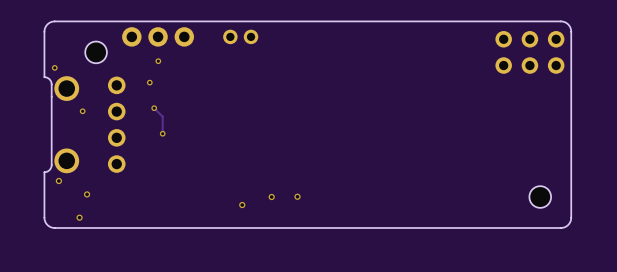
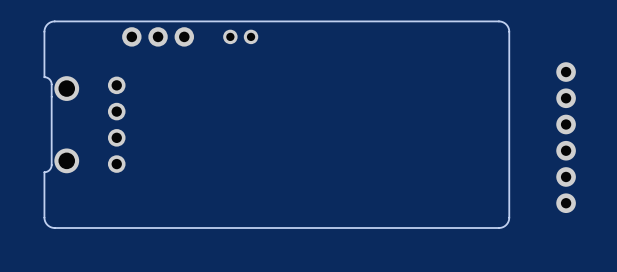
board edge: (498, 21) (562, 21) (569, 25) (571, 31) (570, 221) (562, 227) (498, 228) -> (498, 21) (506, 24) (509, 31) (509, 217) (506, 224) (498, 228)
hole: (96, 52) -> none
part: (529, 52) -> none
via: (158, 61) -> none
via: (54, 67) -> none
via: (149, 82) -> none
track: (154, 108) (162, 116) (162, 133) -> none
via: (154, 108) -> none
via: (82, 111) -> none
via: (162, 133) -> none
part: none -> (566, 137)
via: (58, 181) -> none
via: (87, 194) -> none
via: (297, 196) -> none
via: (271, 197) -> none
hole: (540, 197) -> none
via: (242, 205) -> none
via: (79, 217) -> none

